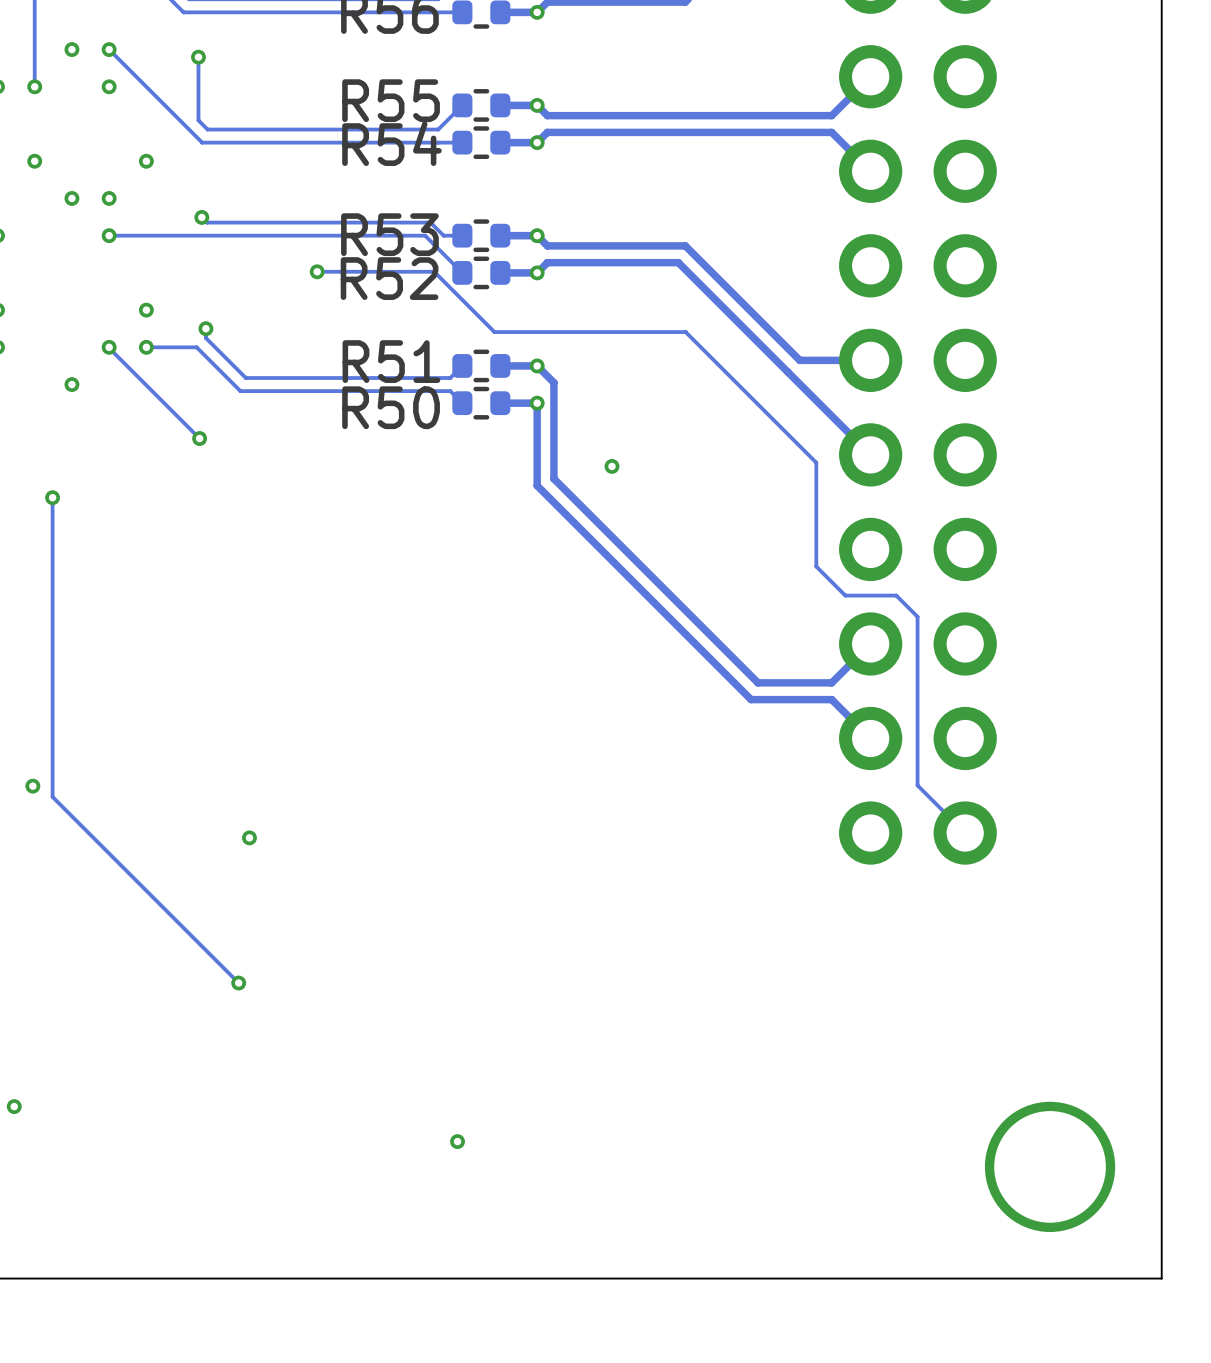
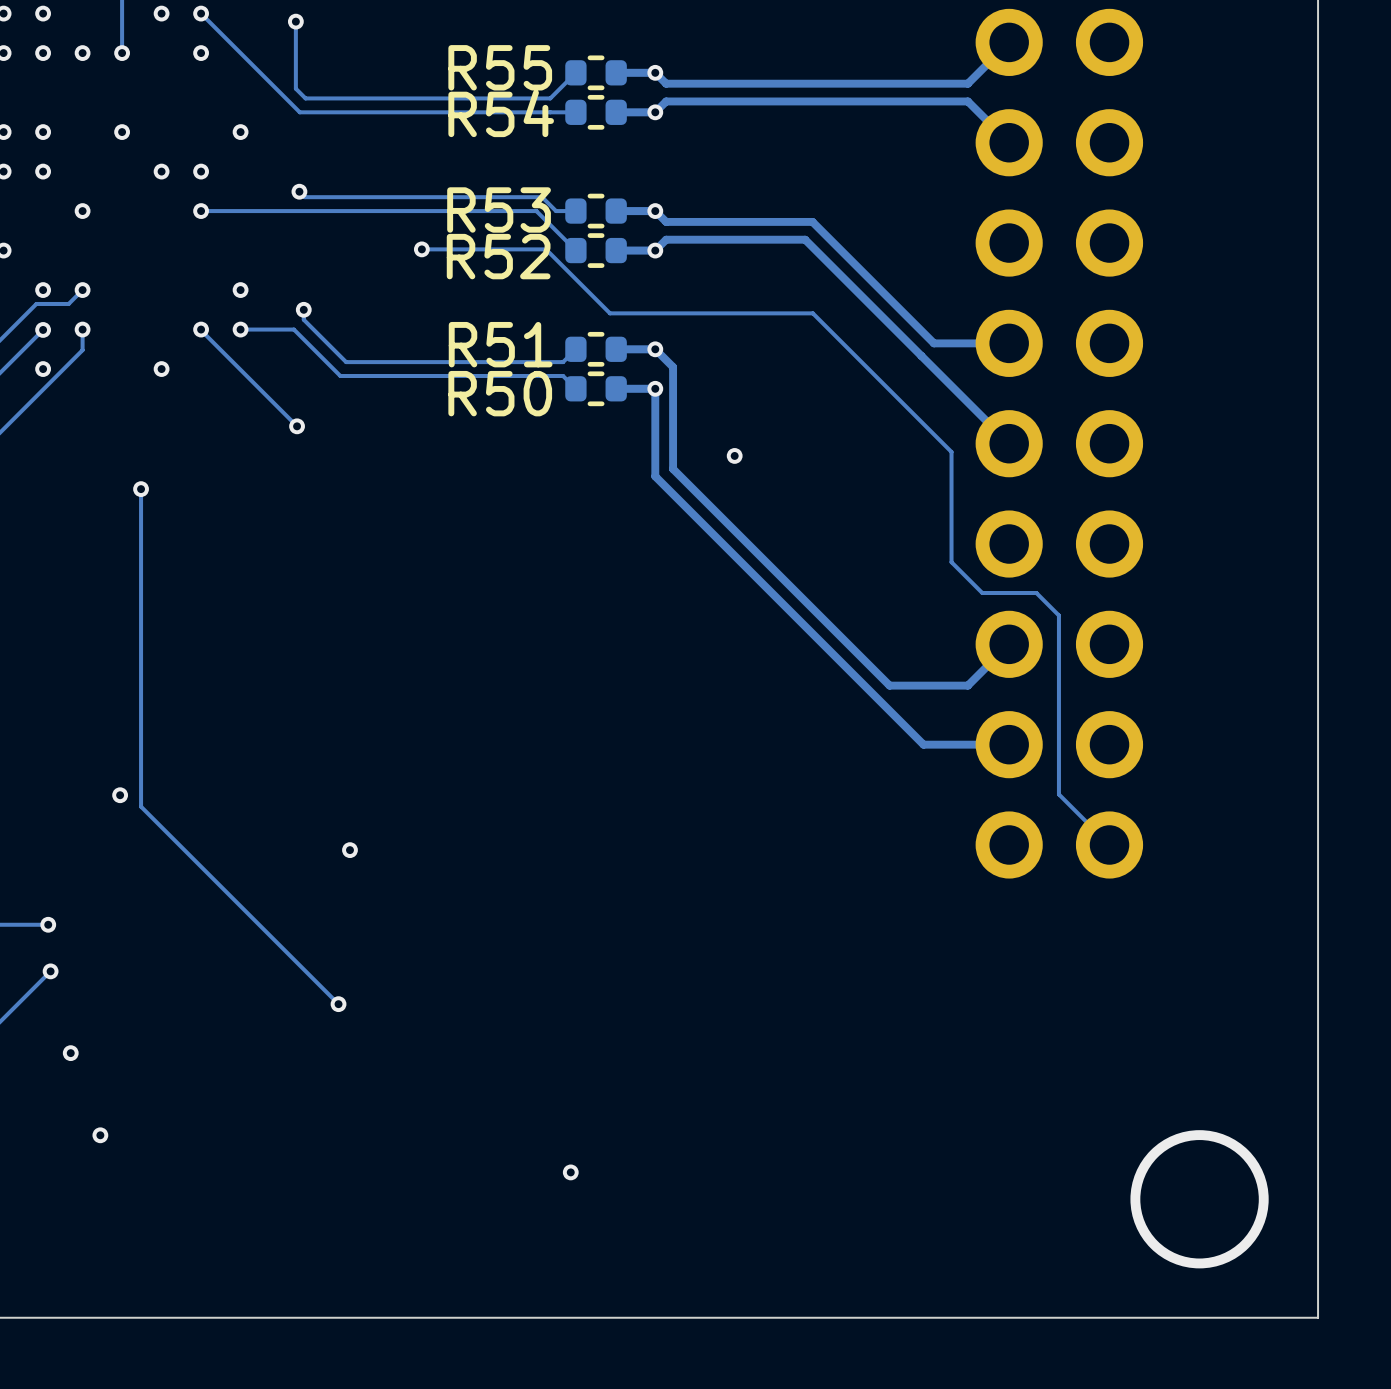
track: (751, 699) (831, 699) (870, 738) -> (882, 703) (923, 744) (1009, 744)

